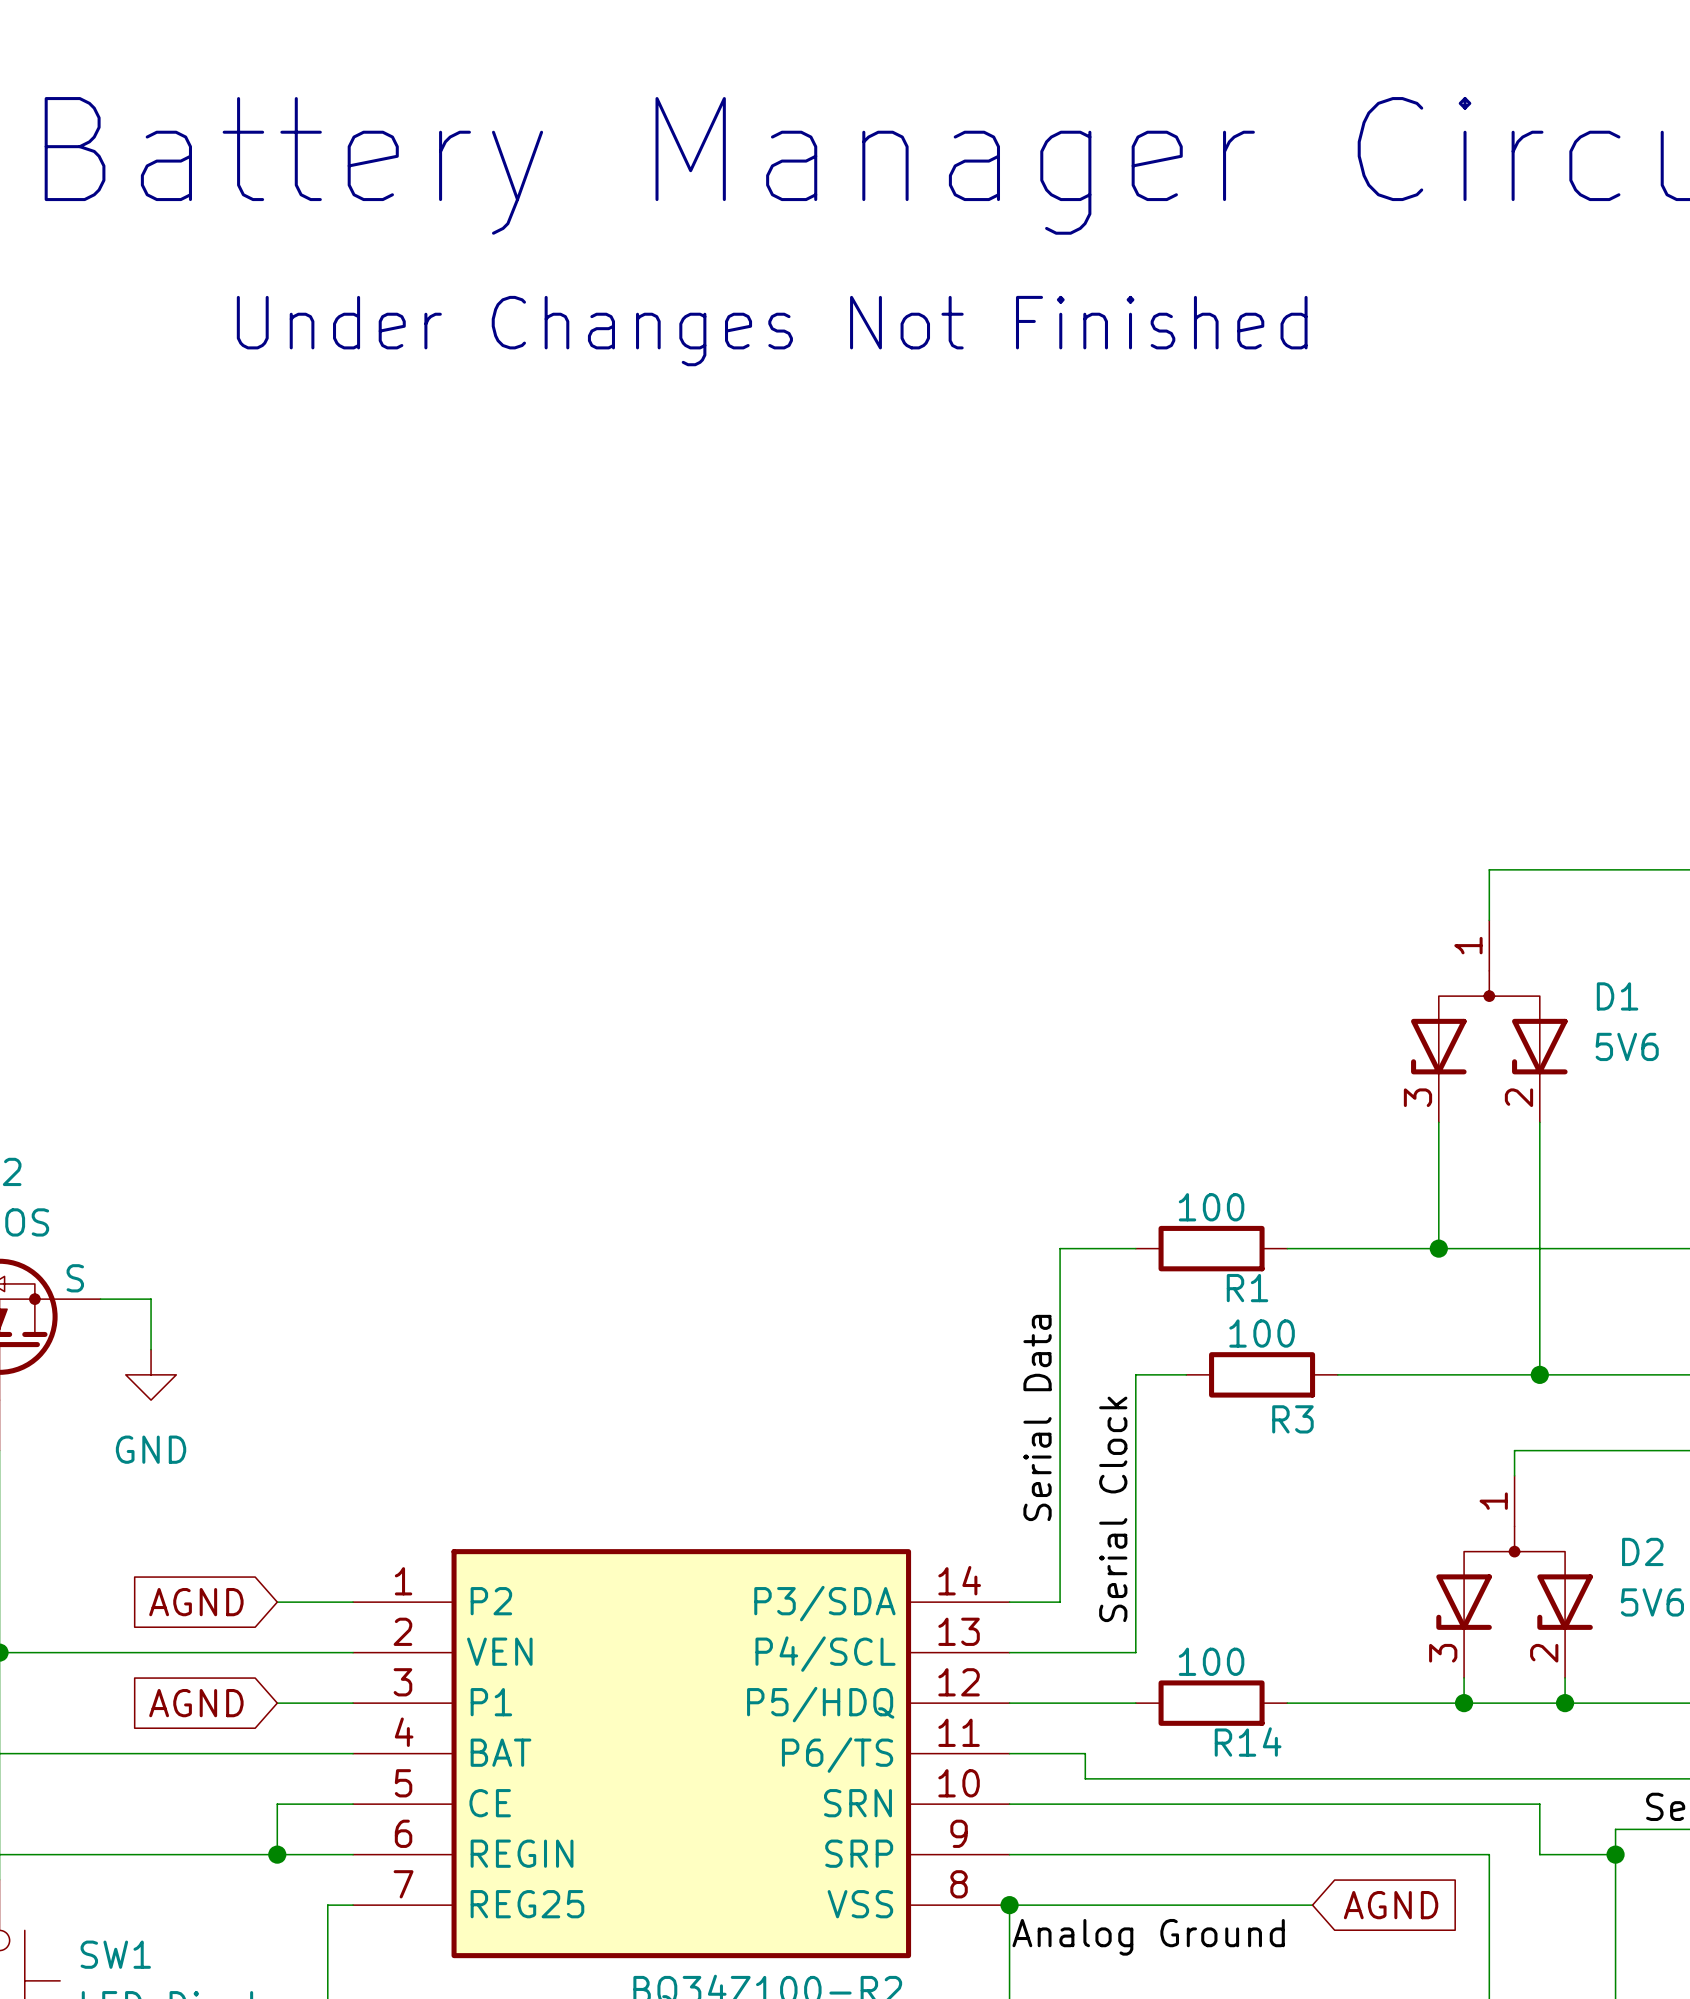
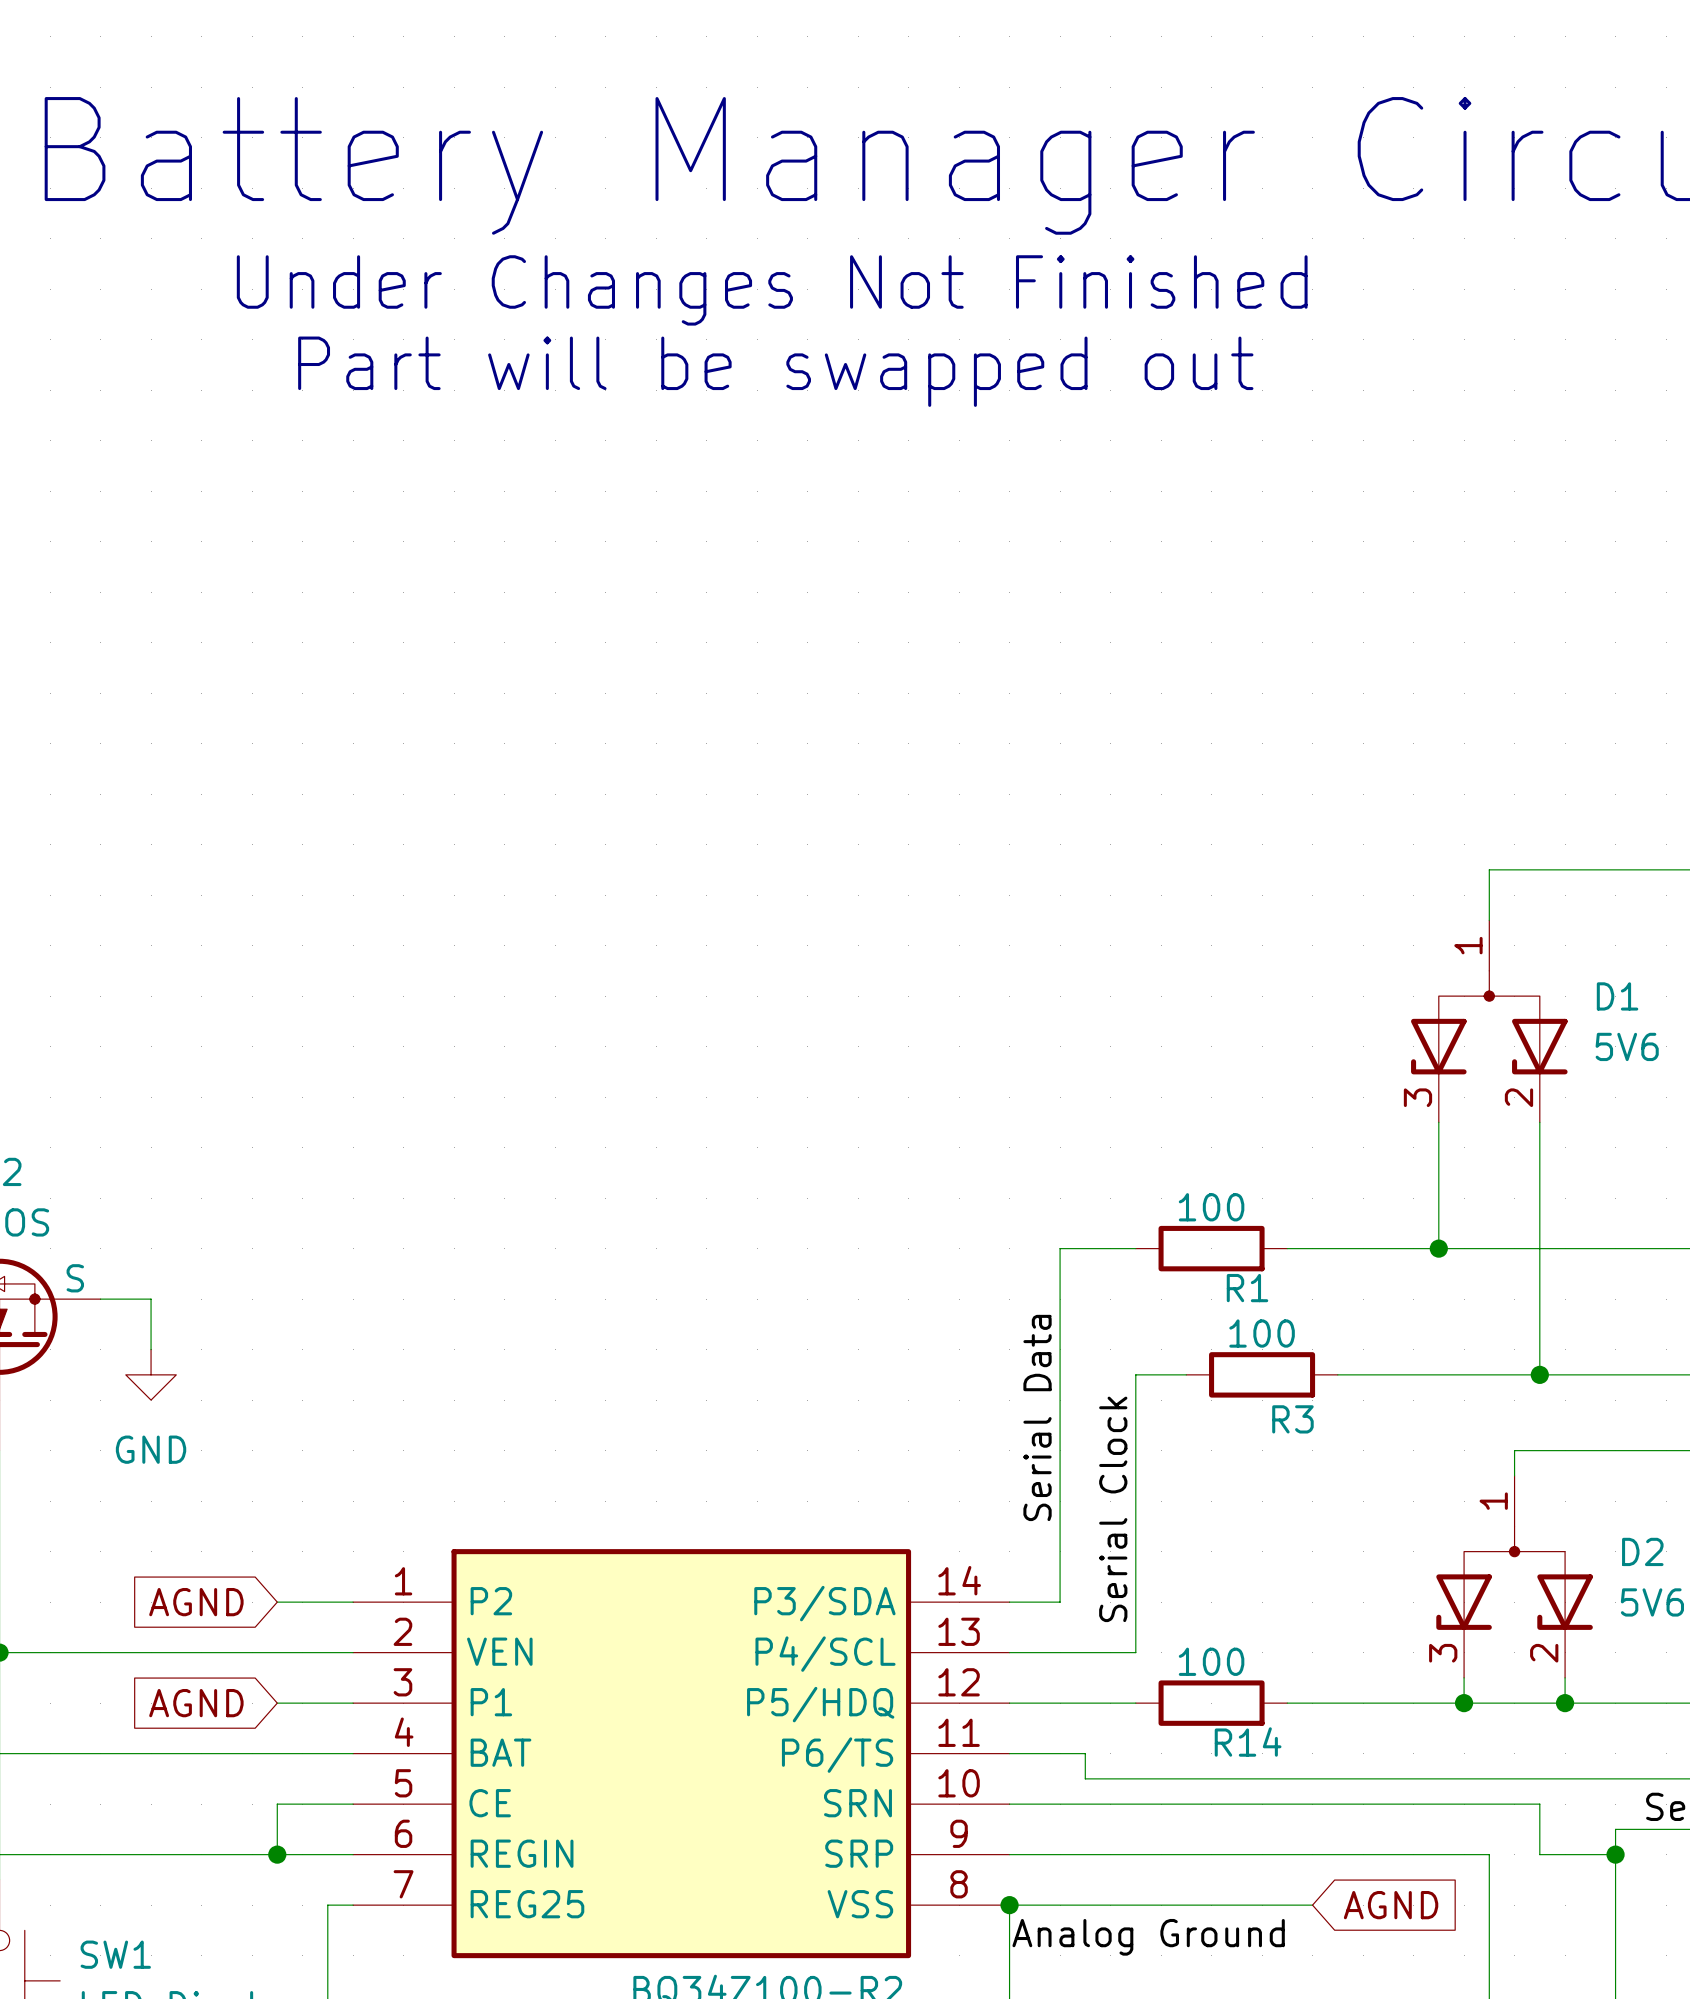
text position: Under Changes Not Finished (772, 331) -> Under Changes Not Finished (772, 290)
text: none -> Part will be swapped out (775, 371)

